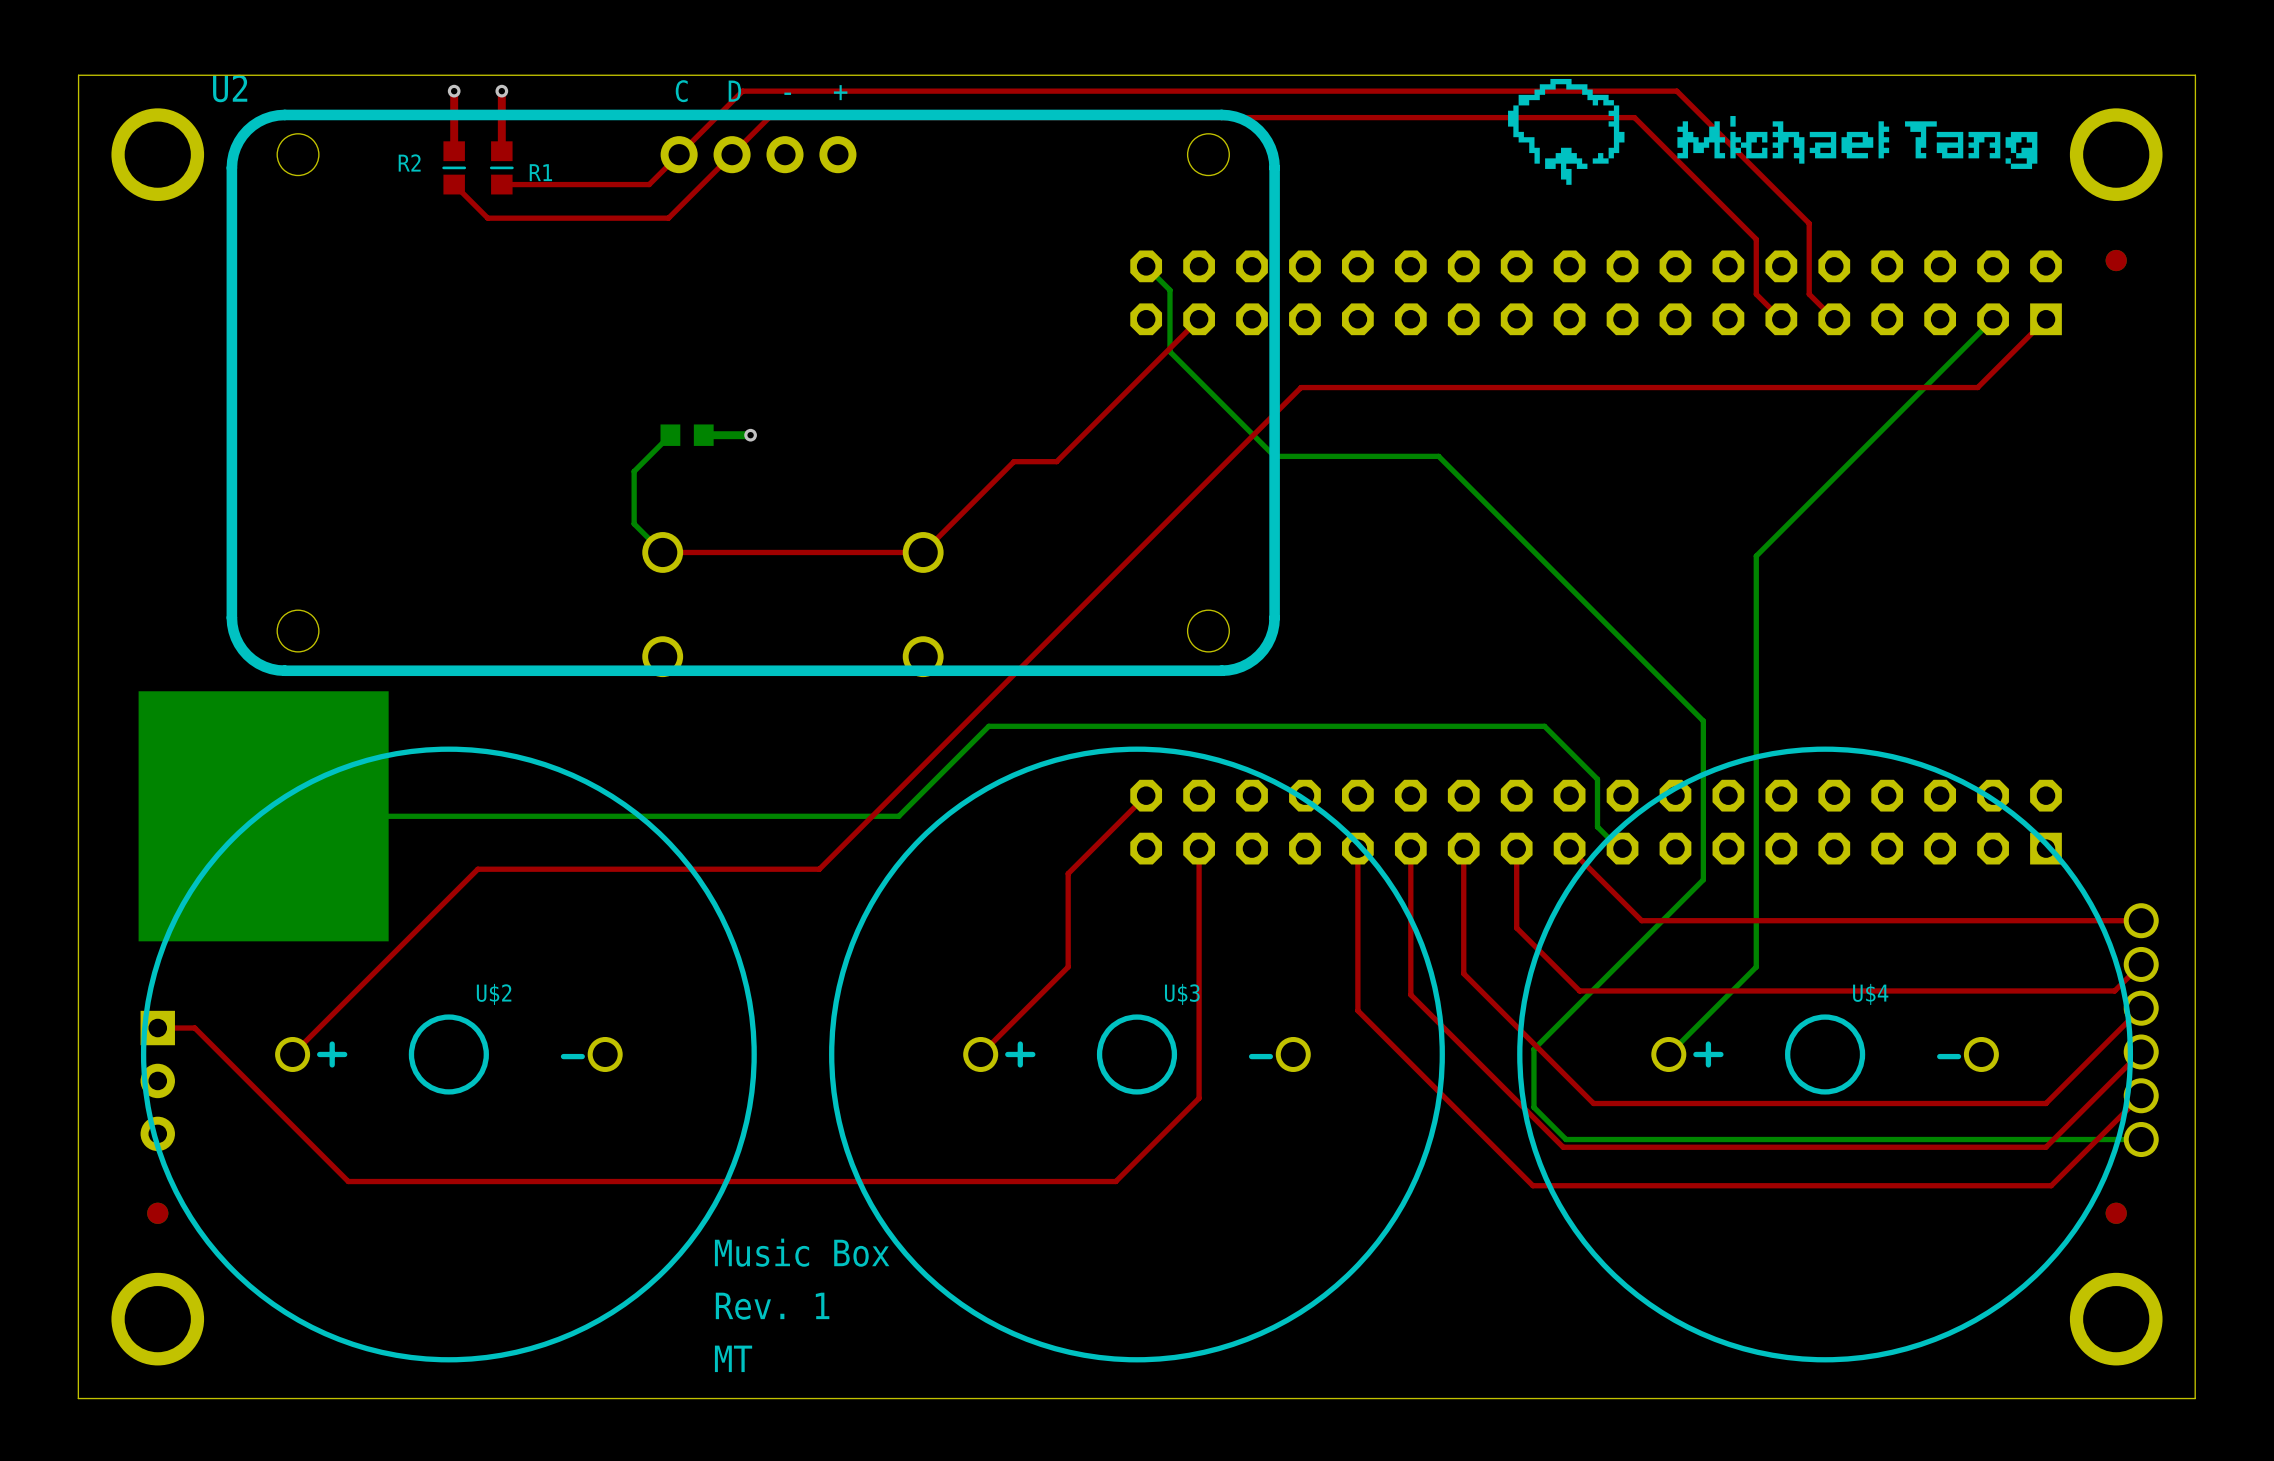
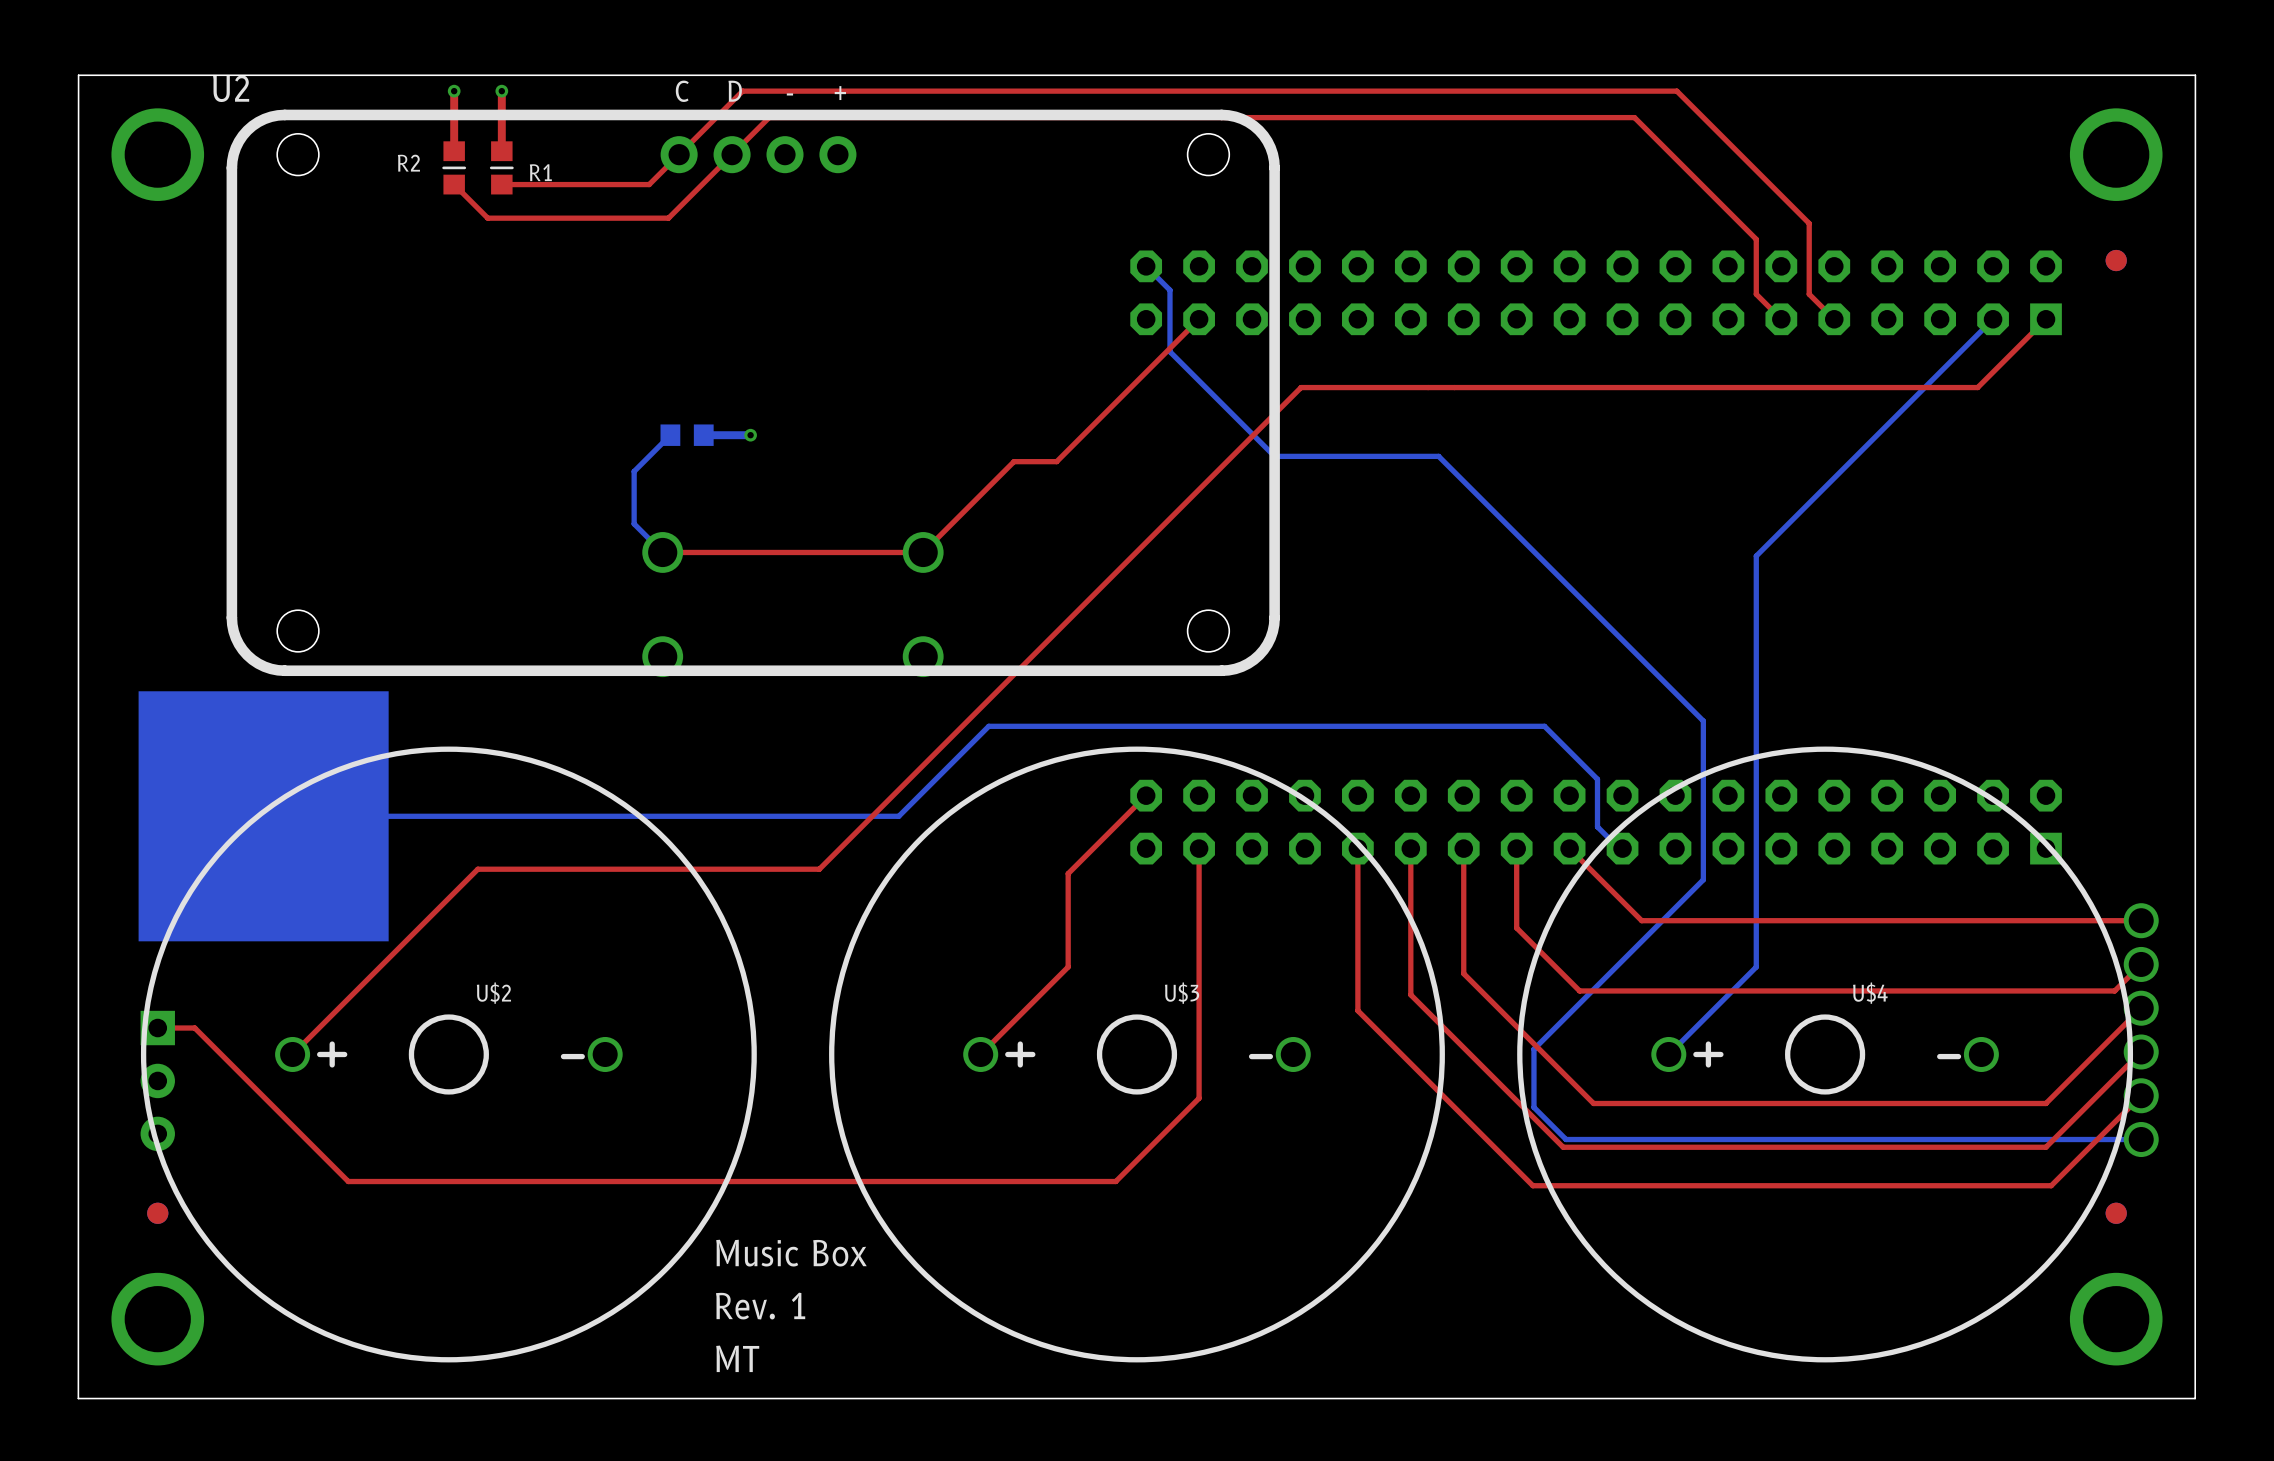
drawing: [1508, 78, 1625, 185] -> none
drawing: [1677, 116, 2038, 169] -> none

